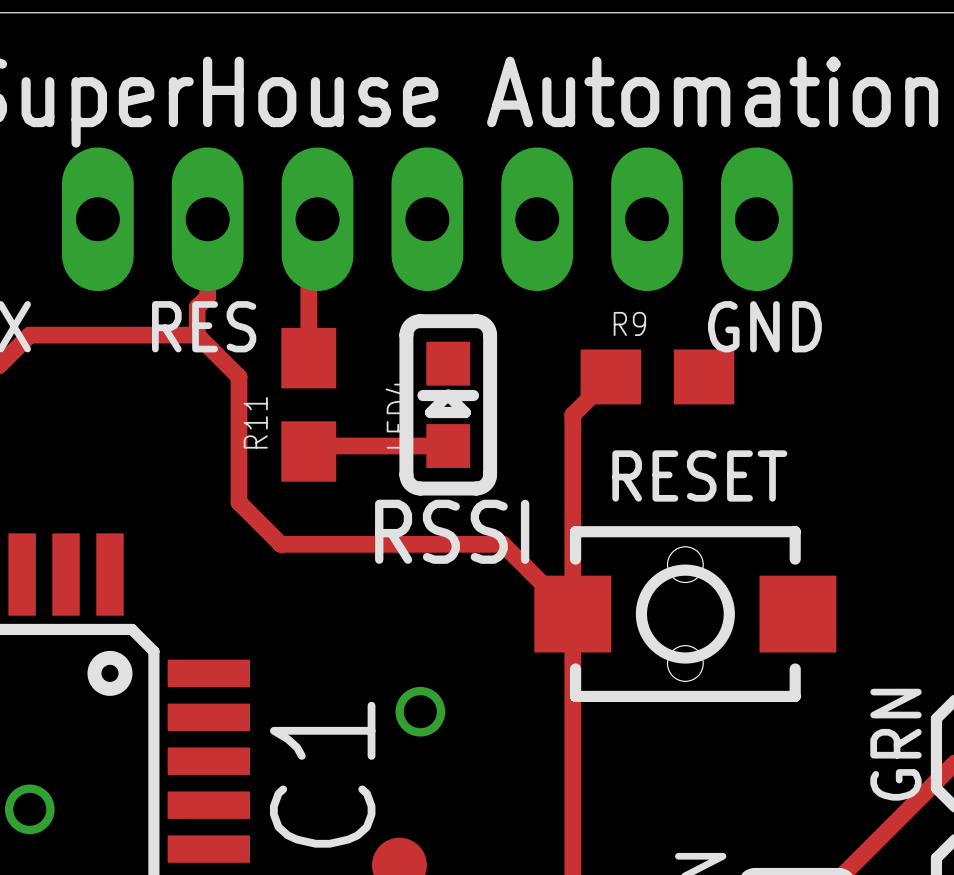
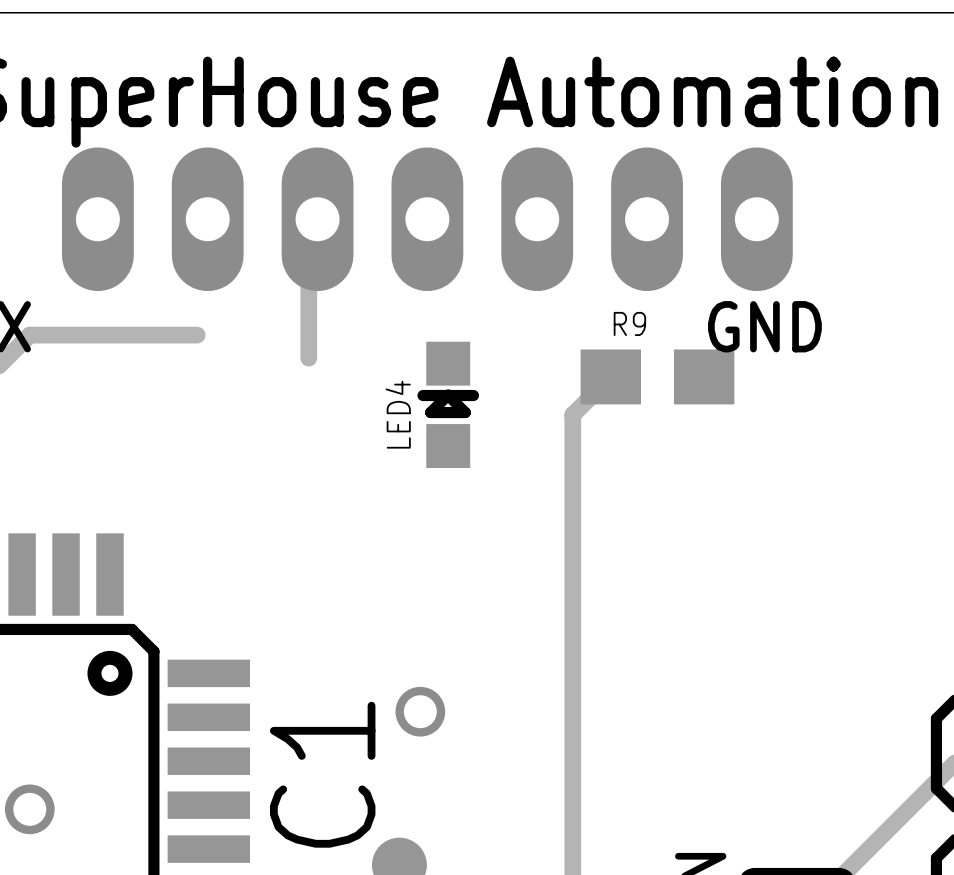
track: (207, 219) (207, 296) (197, 307) (197, 335) (239, 376) (239, 502) (280, 544) (503, 544) (572, 614) -> none
line: (420, 321) (477, 321) (484, 324) (489, 329) (490, 474) (488, 481) (481, 487) (418, 488) (411, 485) (407, 479) (406, 333) (410, 325) (420, 321) -> none
text: RES (204, 326) -> none
R11: (308, 404) -> none
track: (448, 446) (314, 446) (308, 451) -> none
text: RESET (699, 475) -> none
text: RSSI (452, 531) -> none
part: (685, 614) -> none
text: GRN (895, 744) -> none

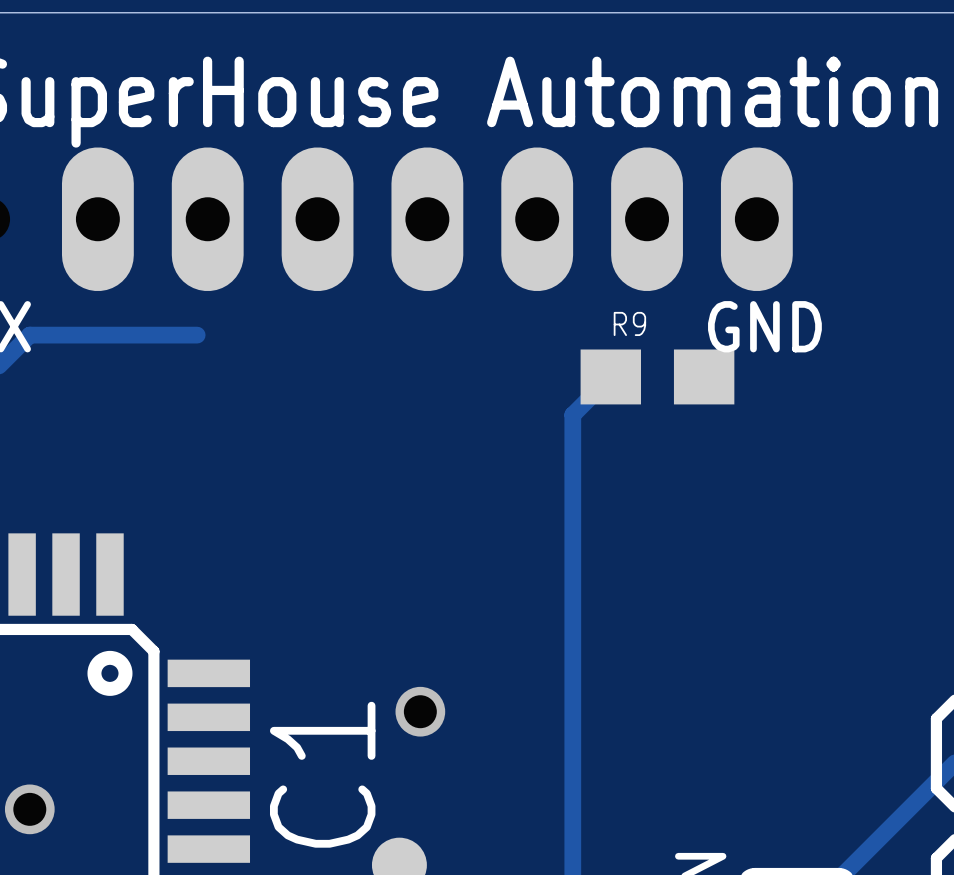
track: (317, 219) (308, 228) (308, 358) -> none
LED4: (448, 404) -> none

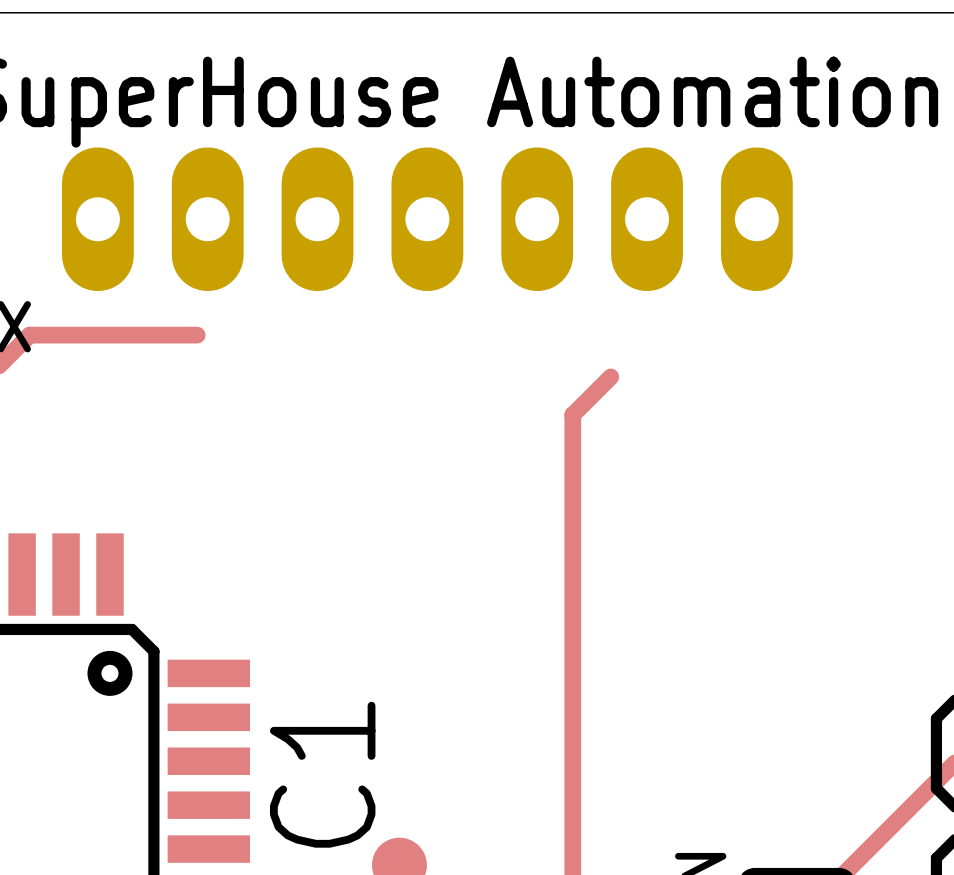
text: GND (764, 326) -> none
R9: (657, 376) -> none
via: (420, 711) -> none
via: (29, 809) -> none

